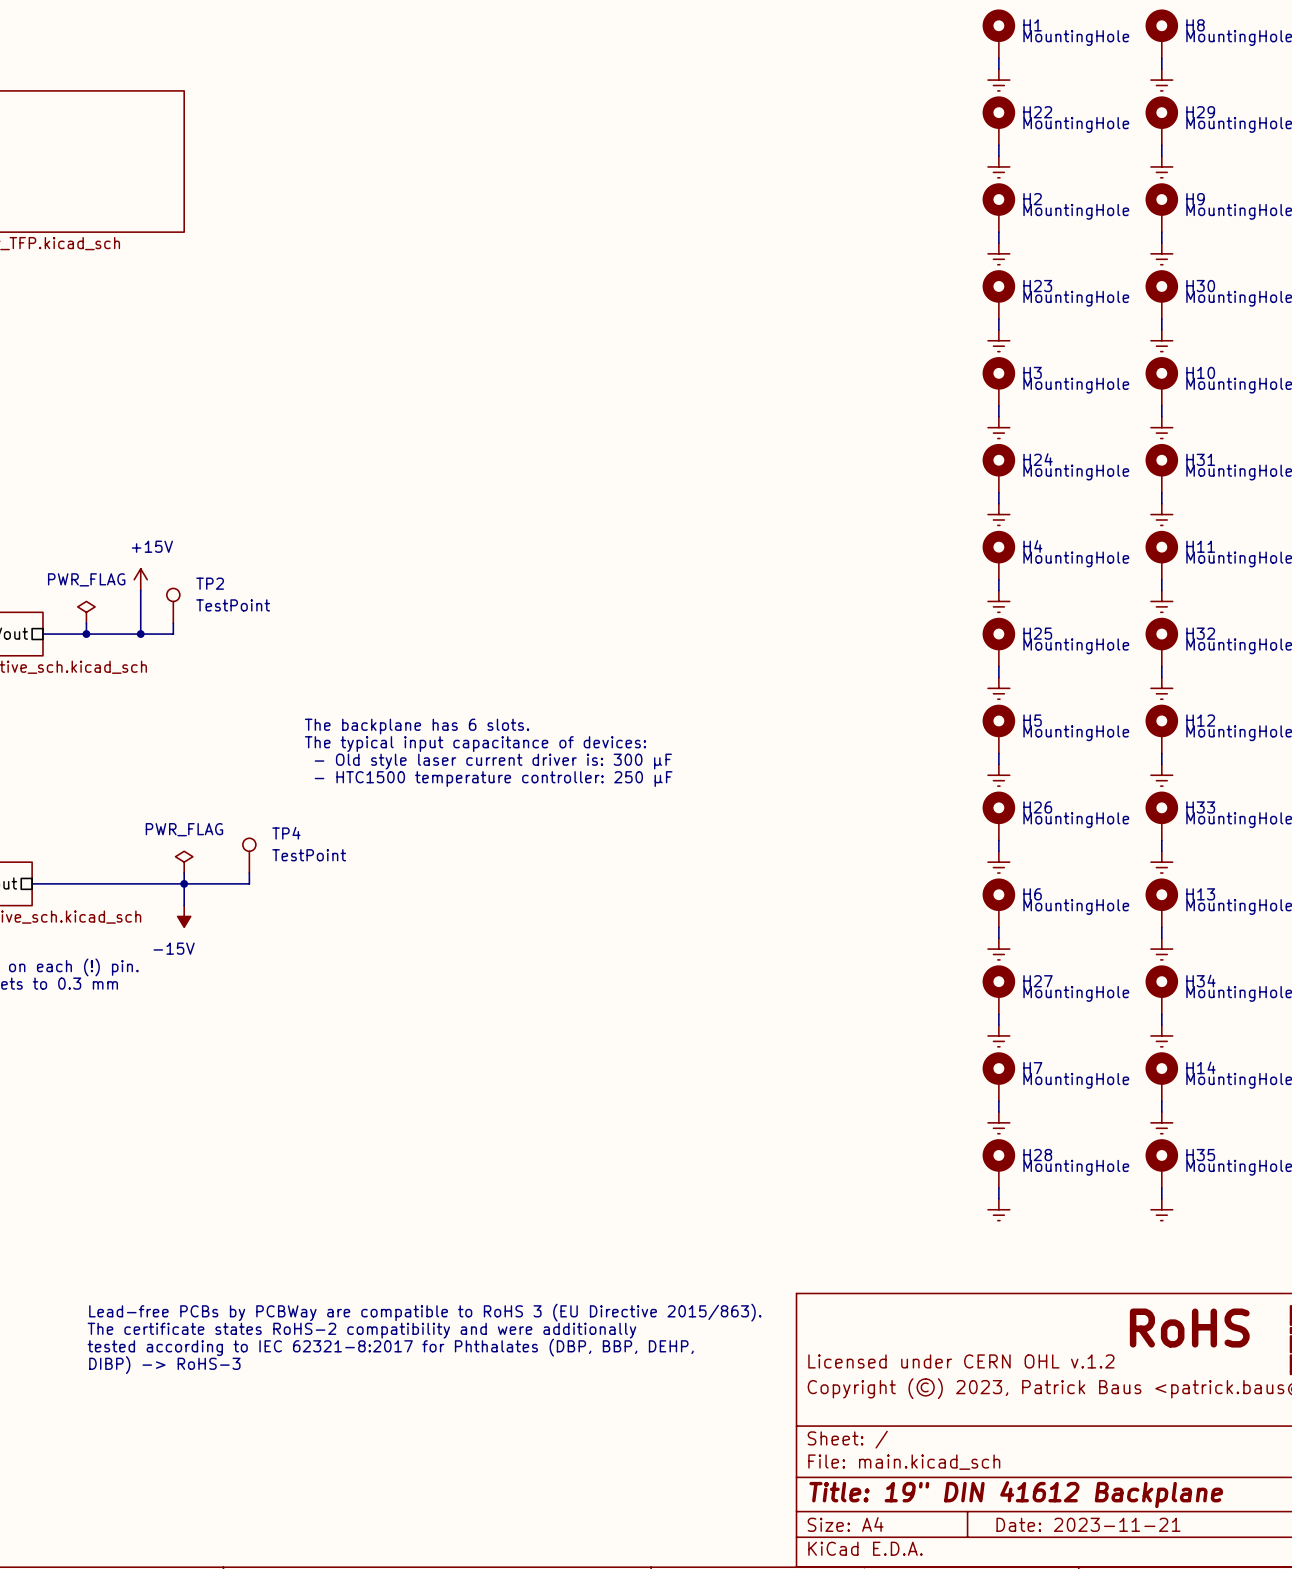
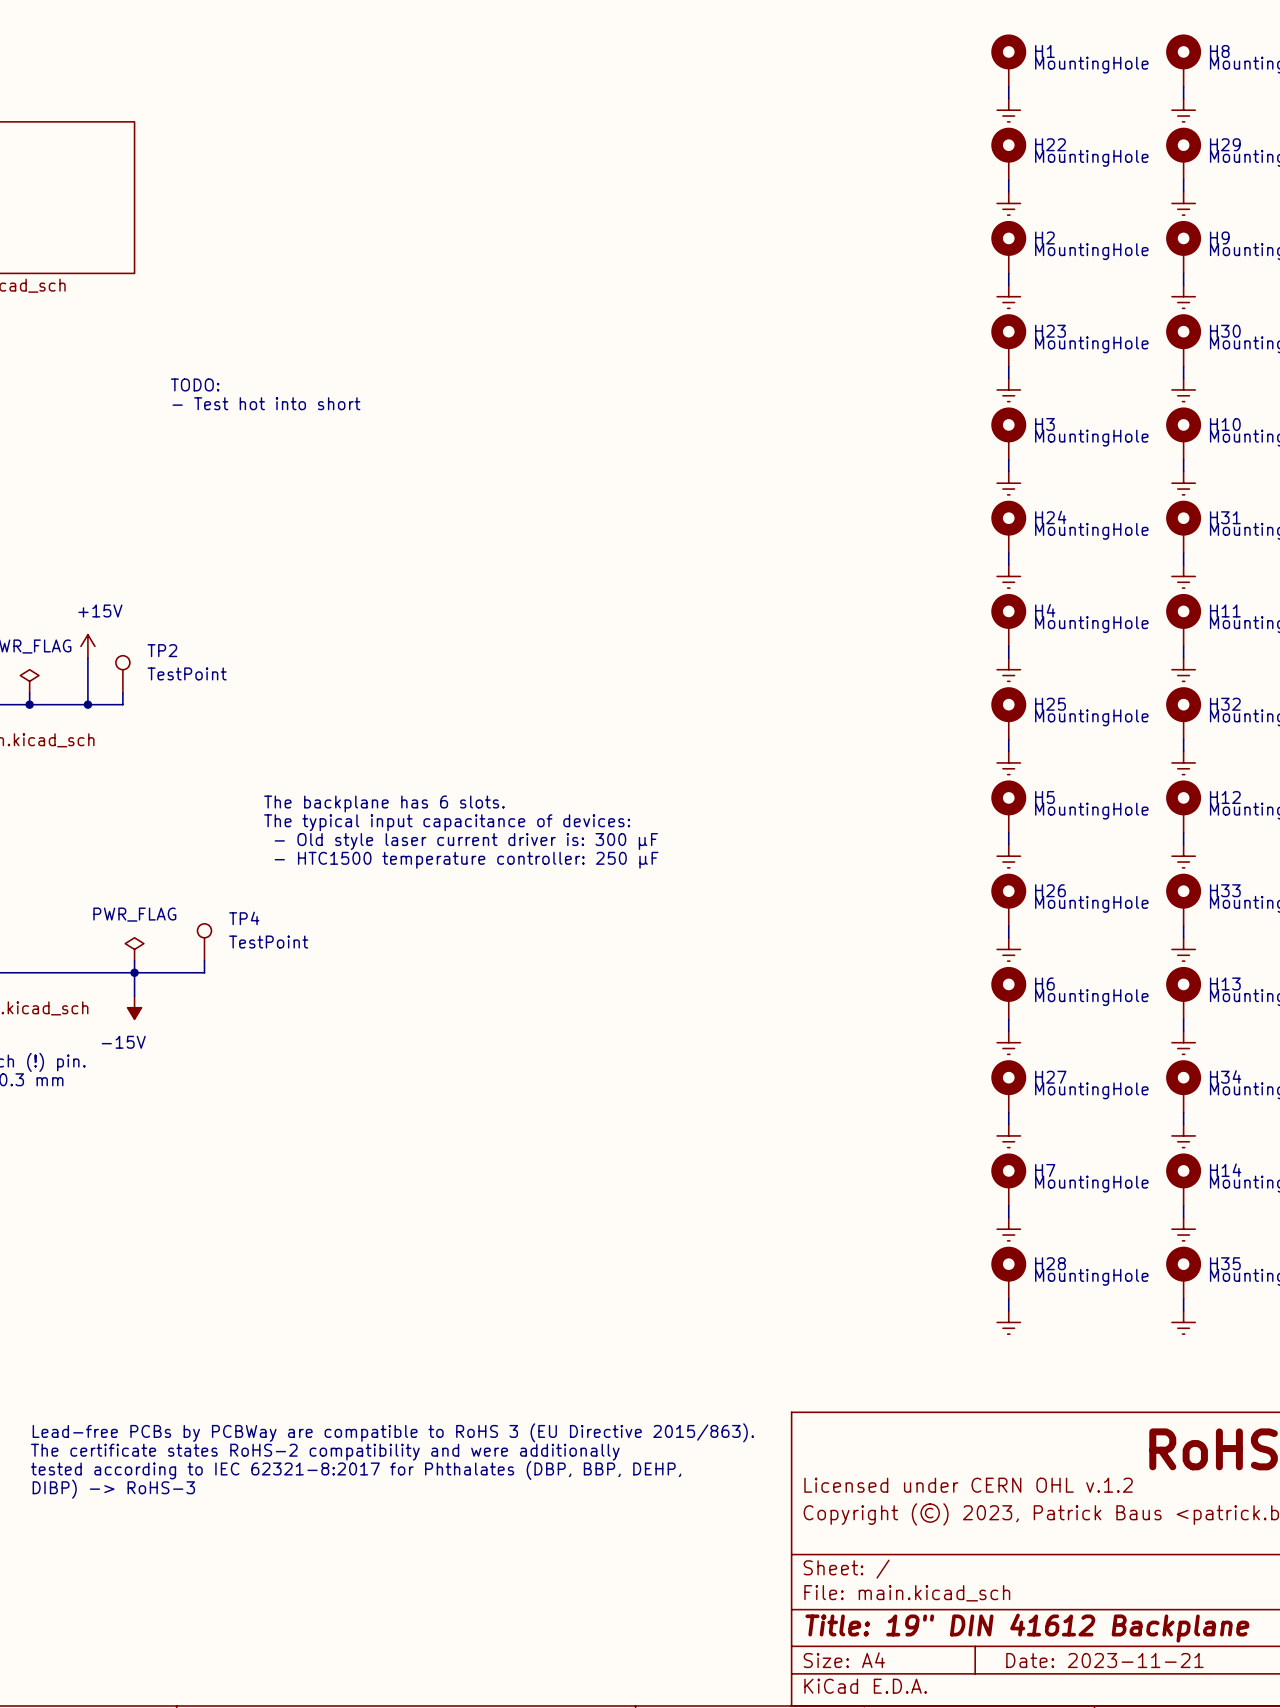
text: none -> TODO: (195, 384)
text: none -> - Test hot into short (266, 403)

